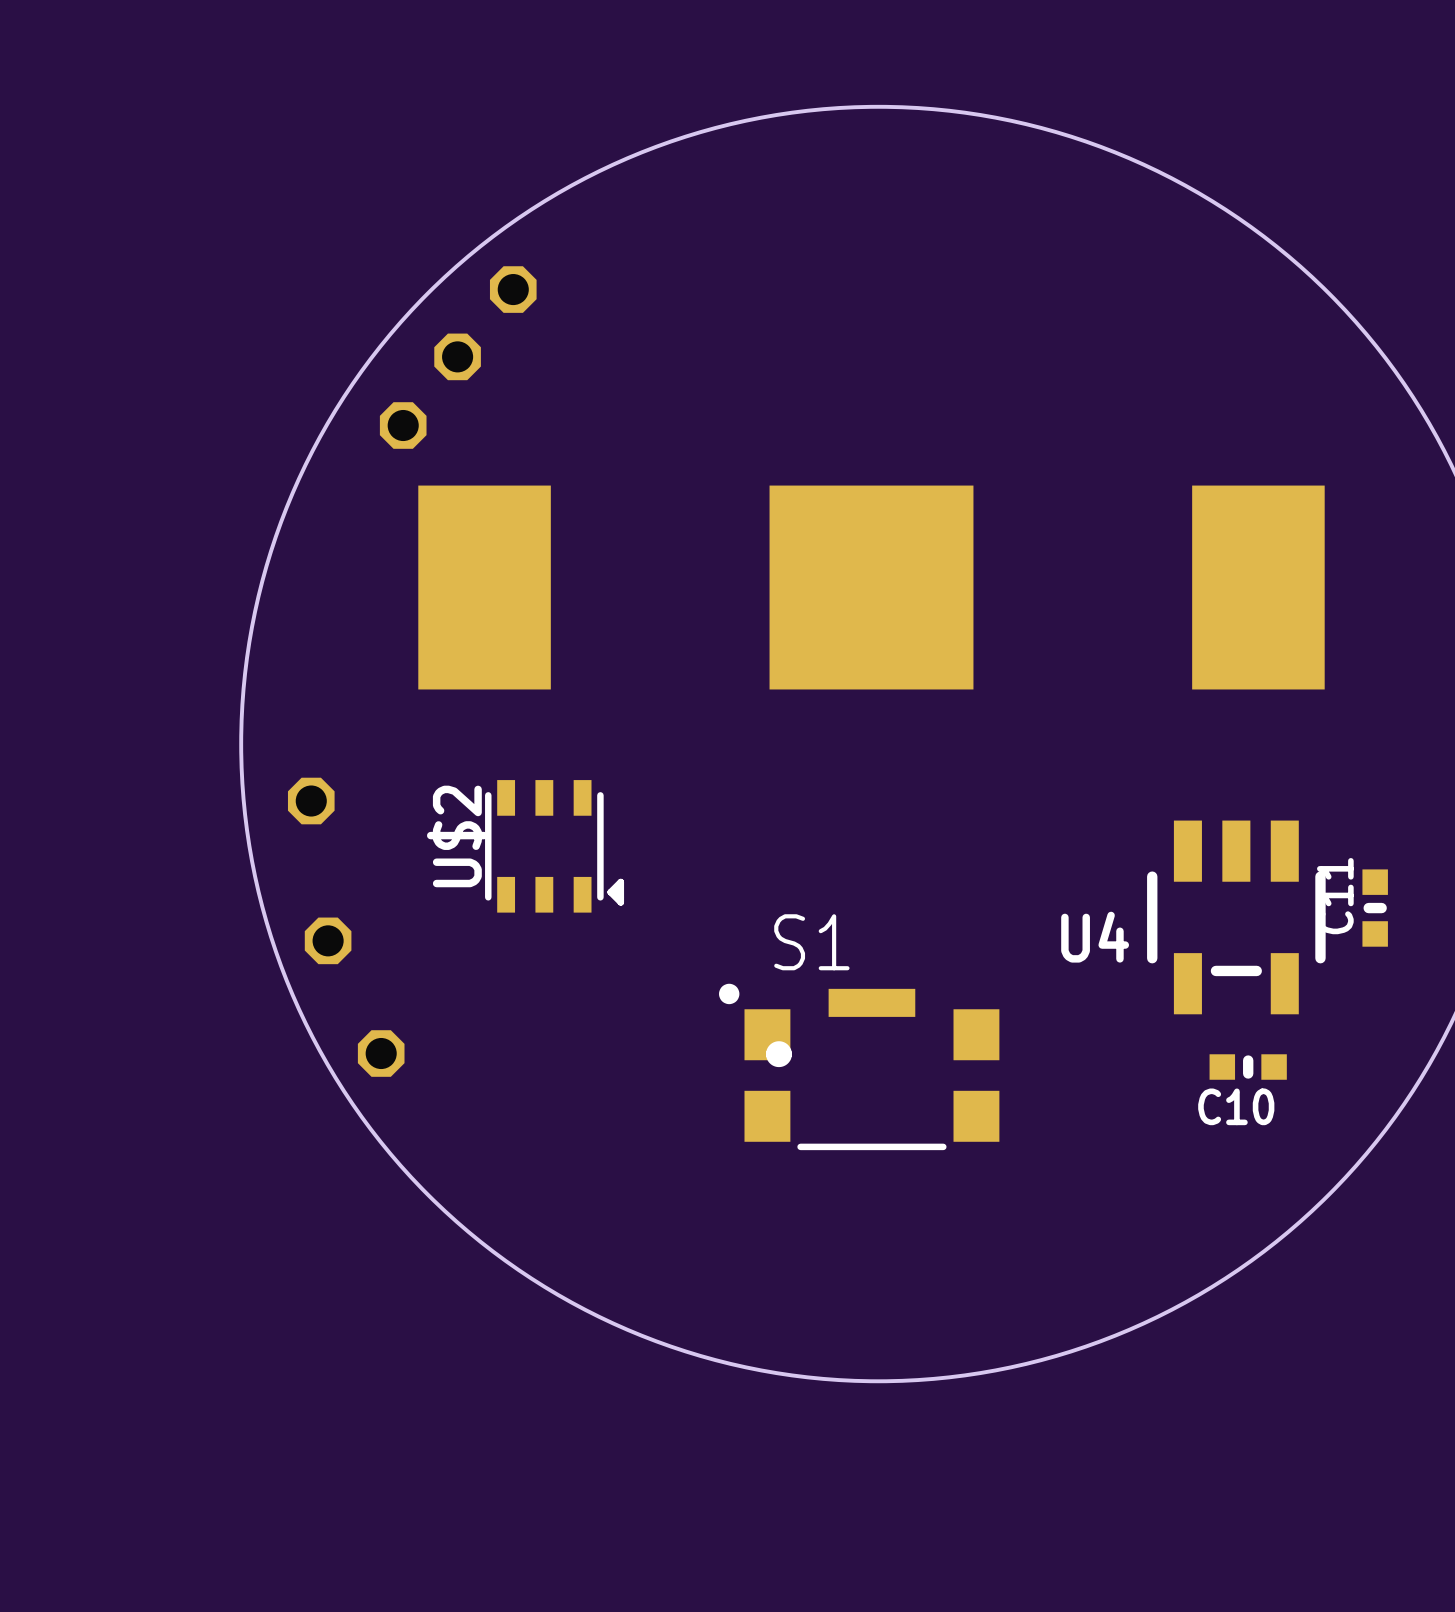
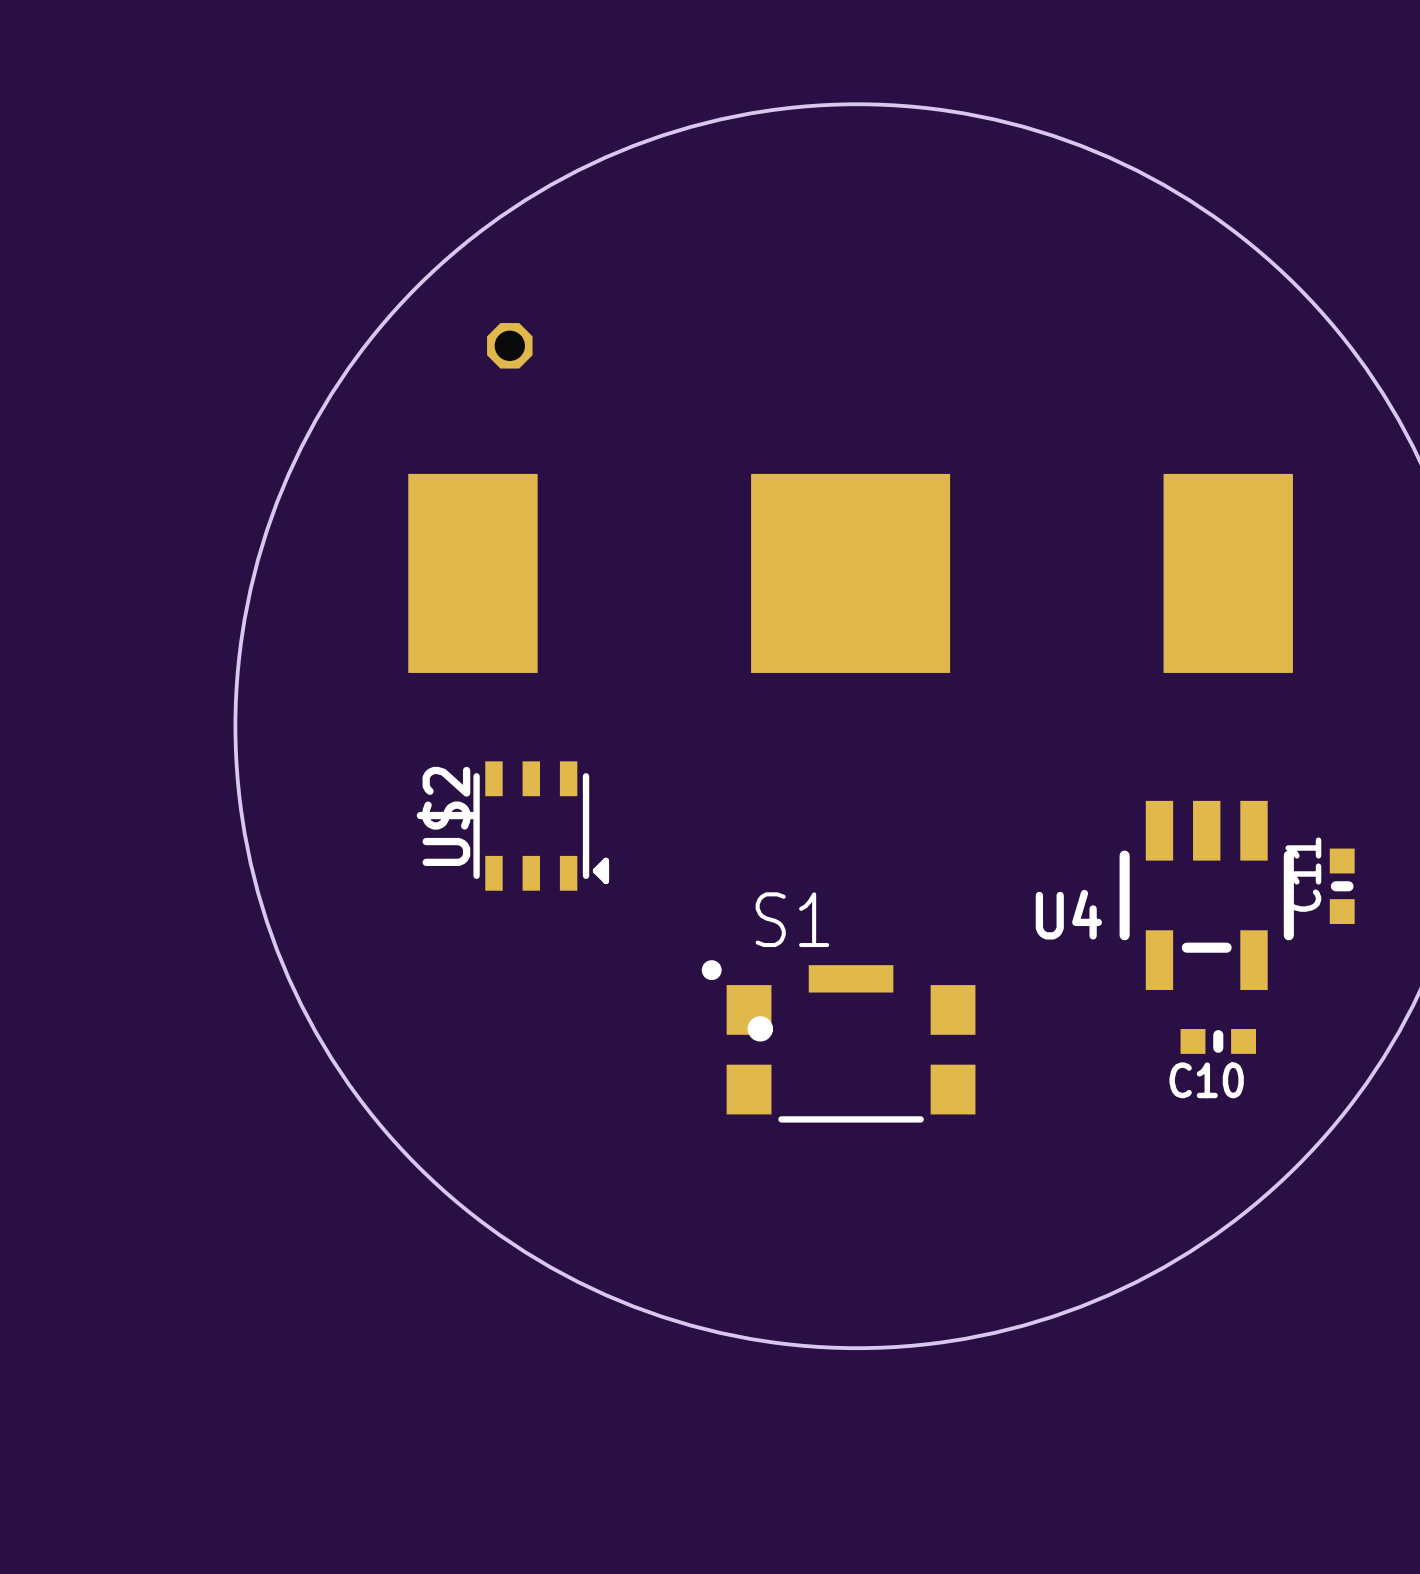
part: (513, 289) -> none
part: none -> (509, 345)
part: (457, 356) -> none
part: (403, 425) -> none
part: (311, 801) -> none
part: (328, 940) -> none
part: (381, 1053) -> none

